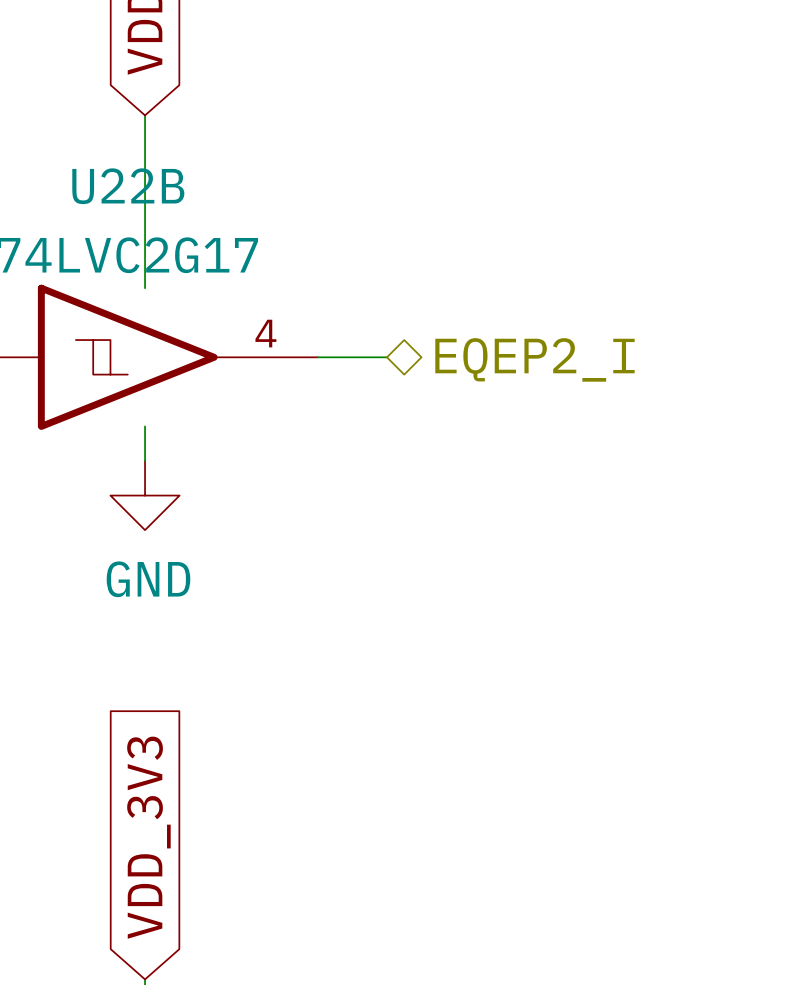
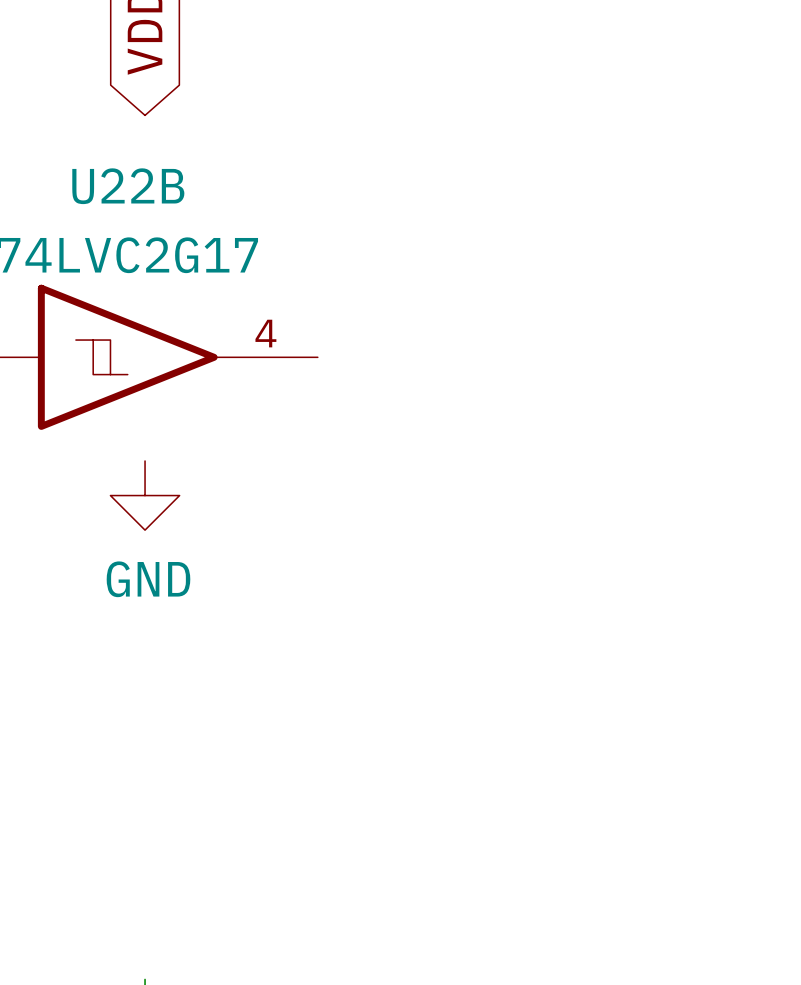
wire: (145, 115) (145, 288) -> none
wire: (317, 357) (386, 357) -> none
hierarchical label: EQEP2_I (534, 359) -> none
wire: (145, 426) (145, 460) -> none
global label: VDD_3V3 (148, 837) -> none

